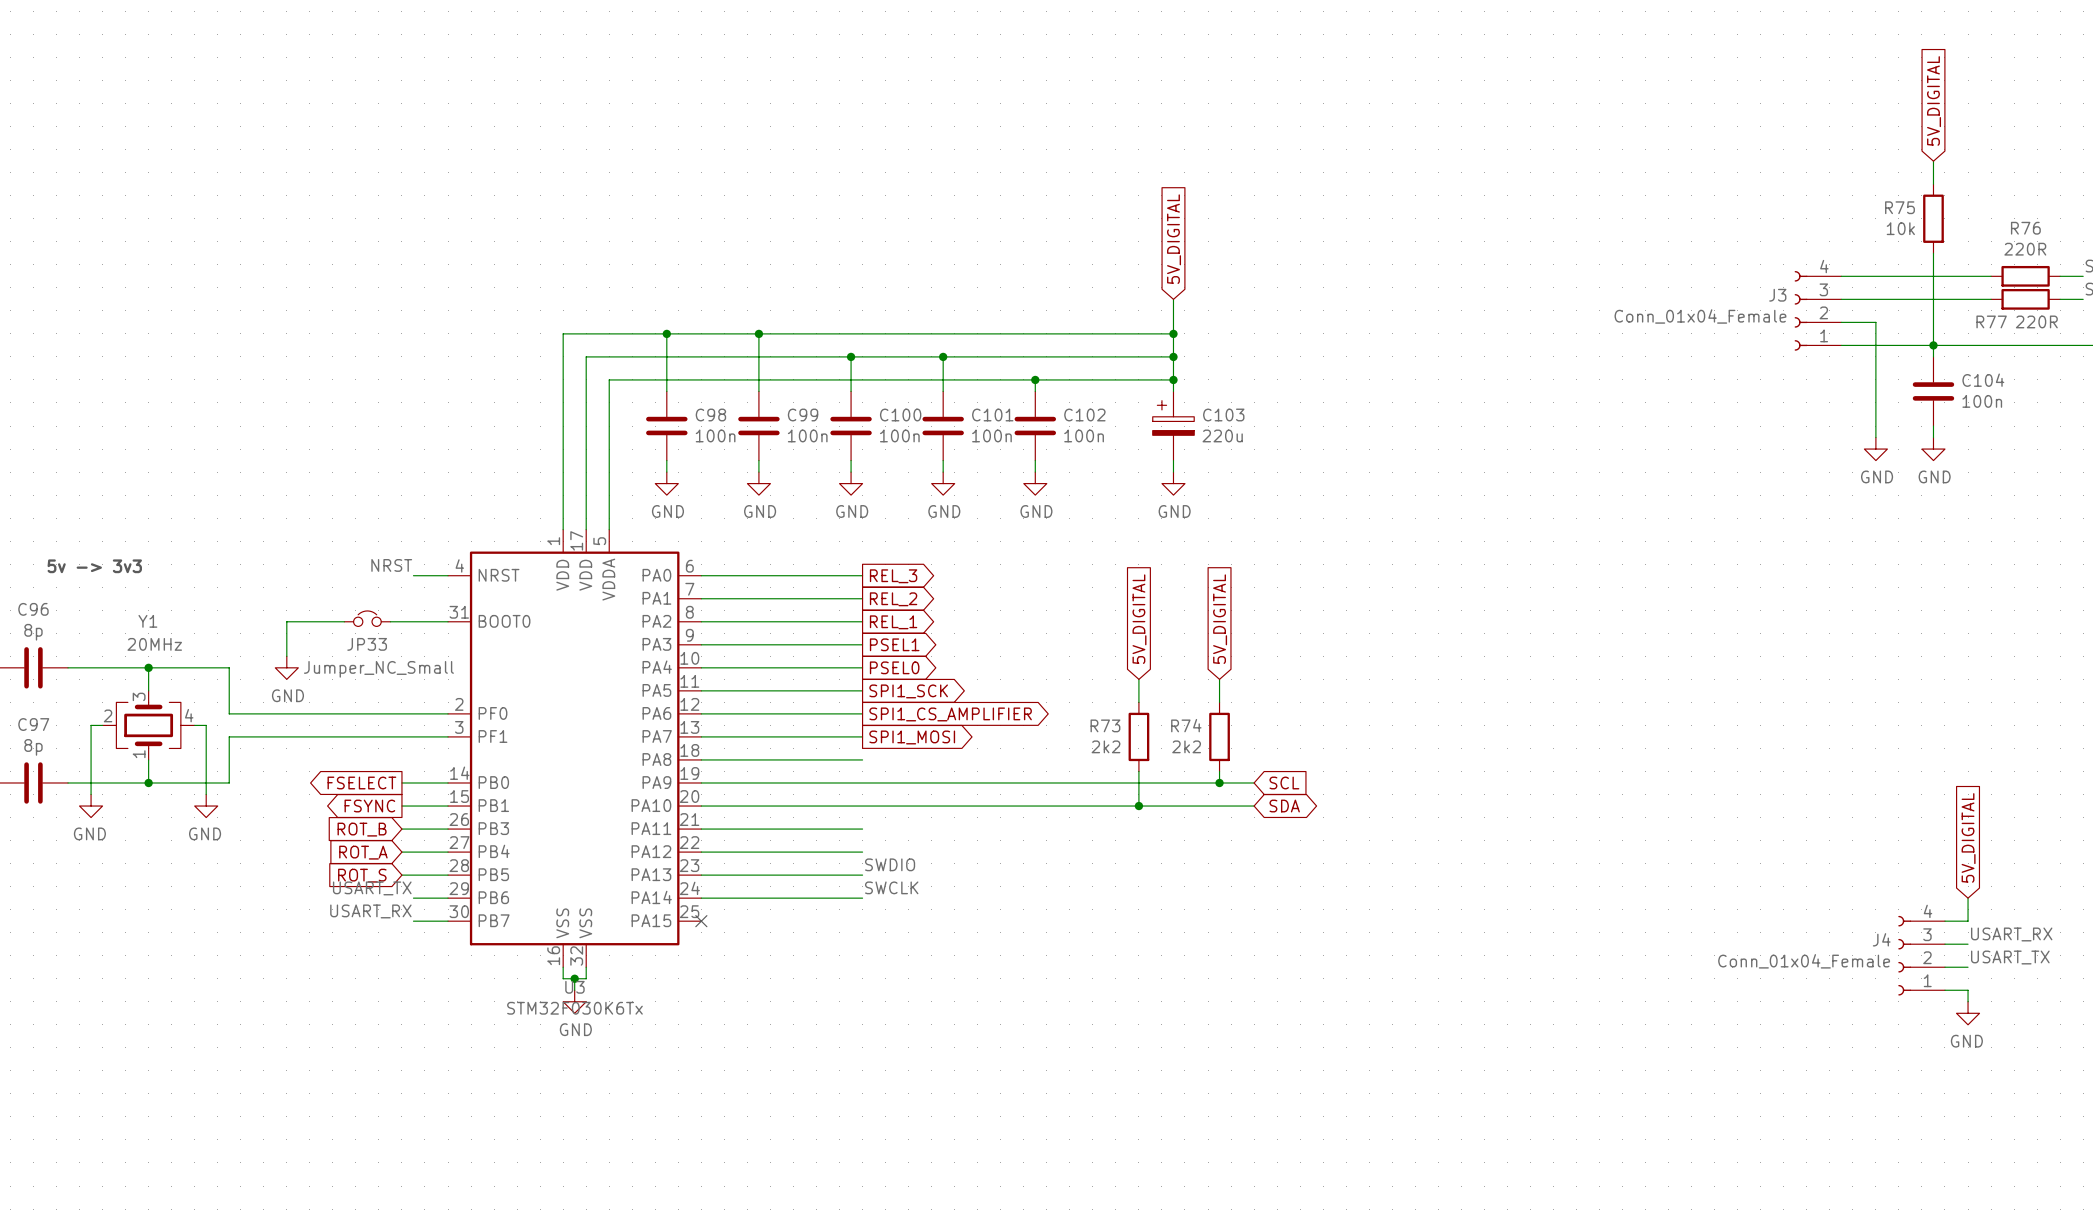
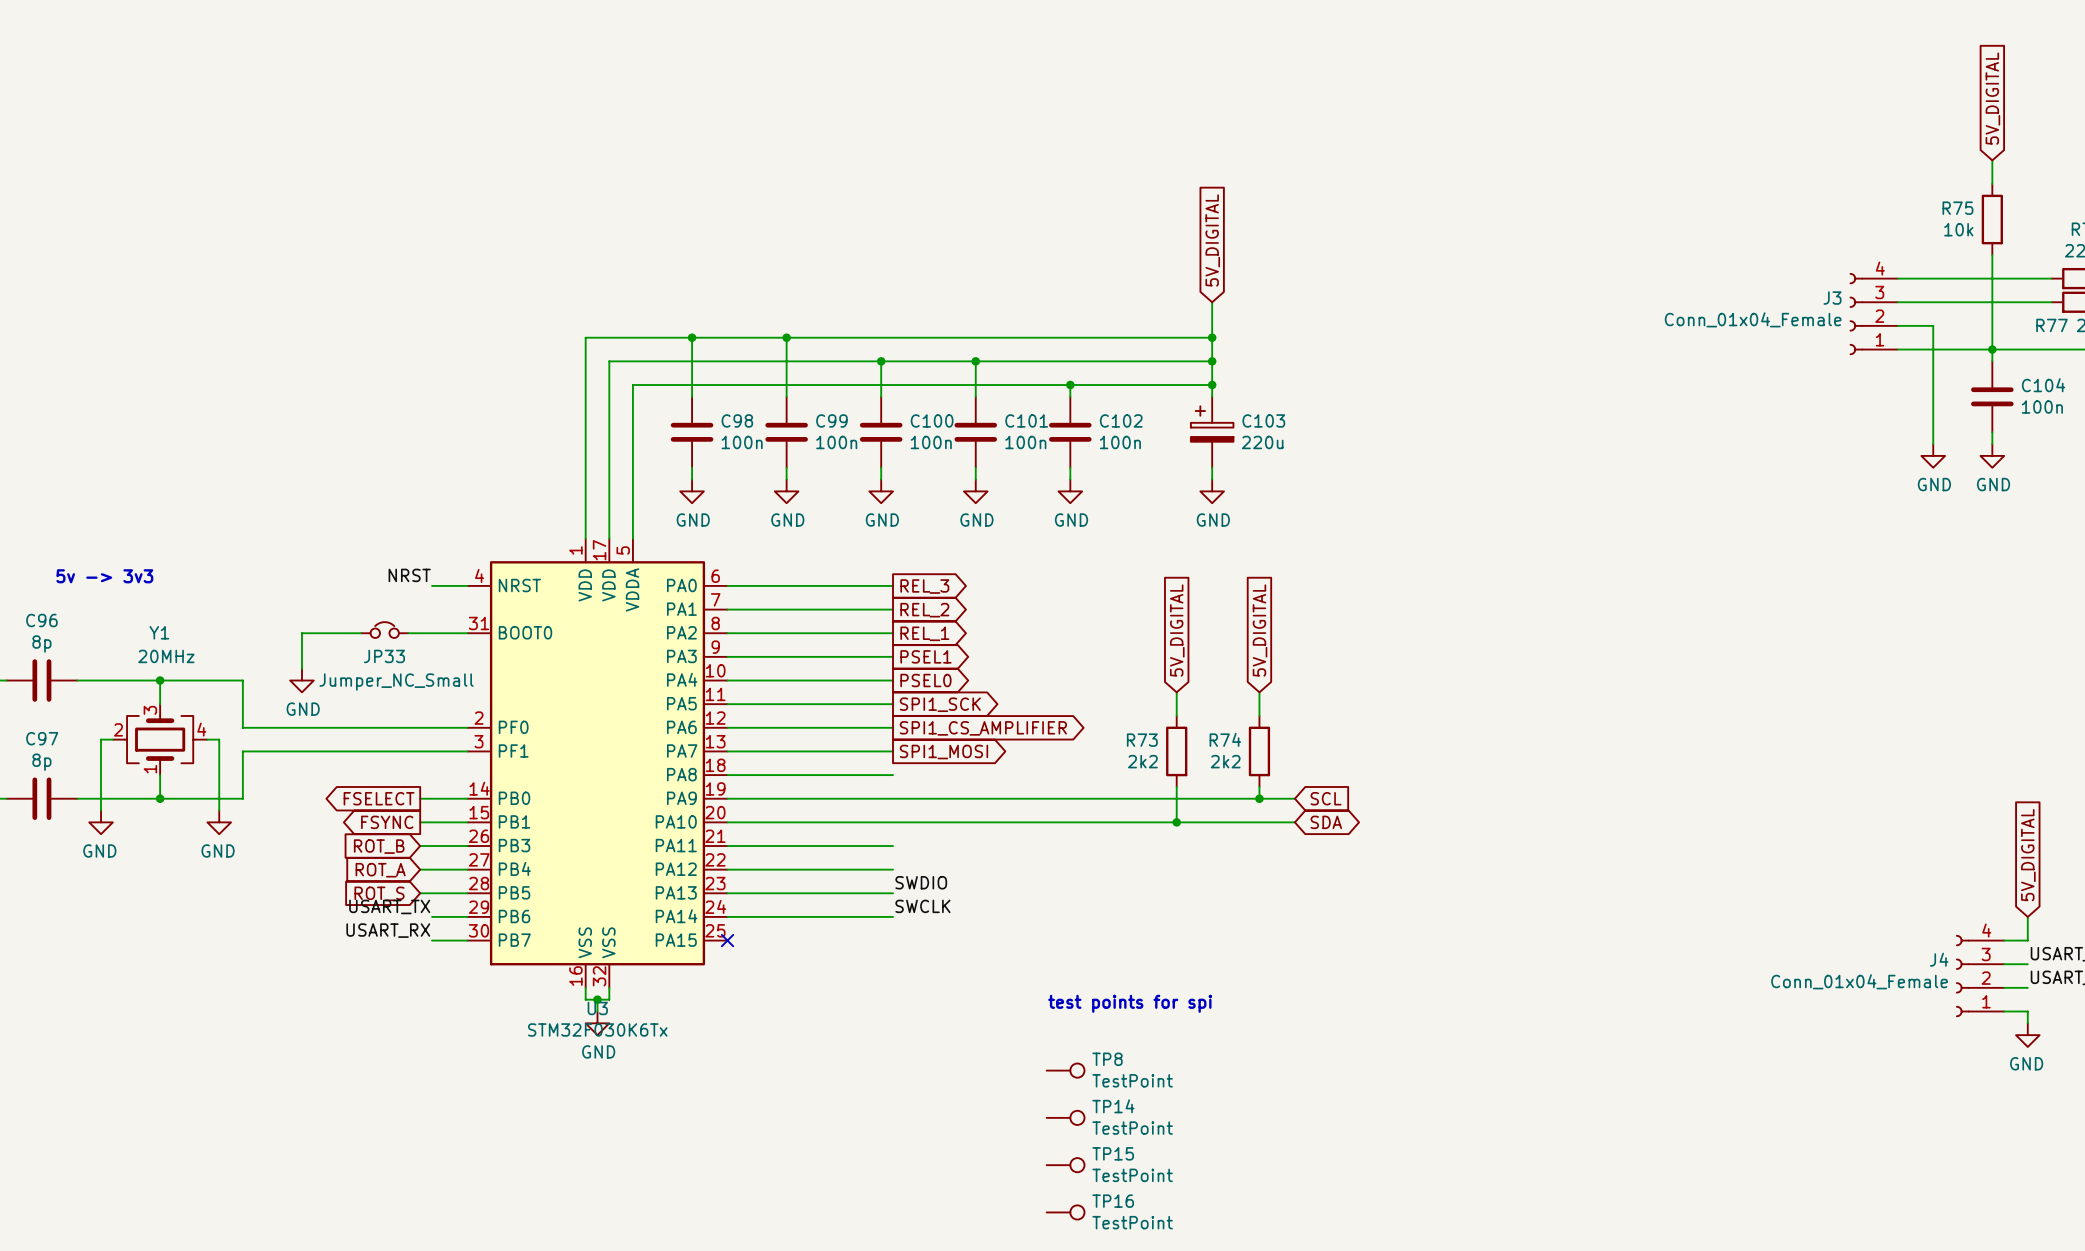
text: none -> test points for spi (1130, 1003)
TP8: none -> TestPoint (1065, 1070)
TP14: none -> TestPoint (1065, 1117)
TP15: none -> TestPoint (1065, 1165)
TP16: none -> TestPoint (1065, 1212)

